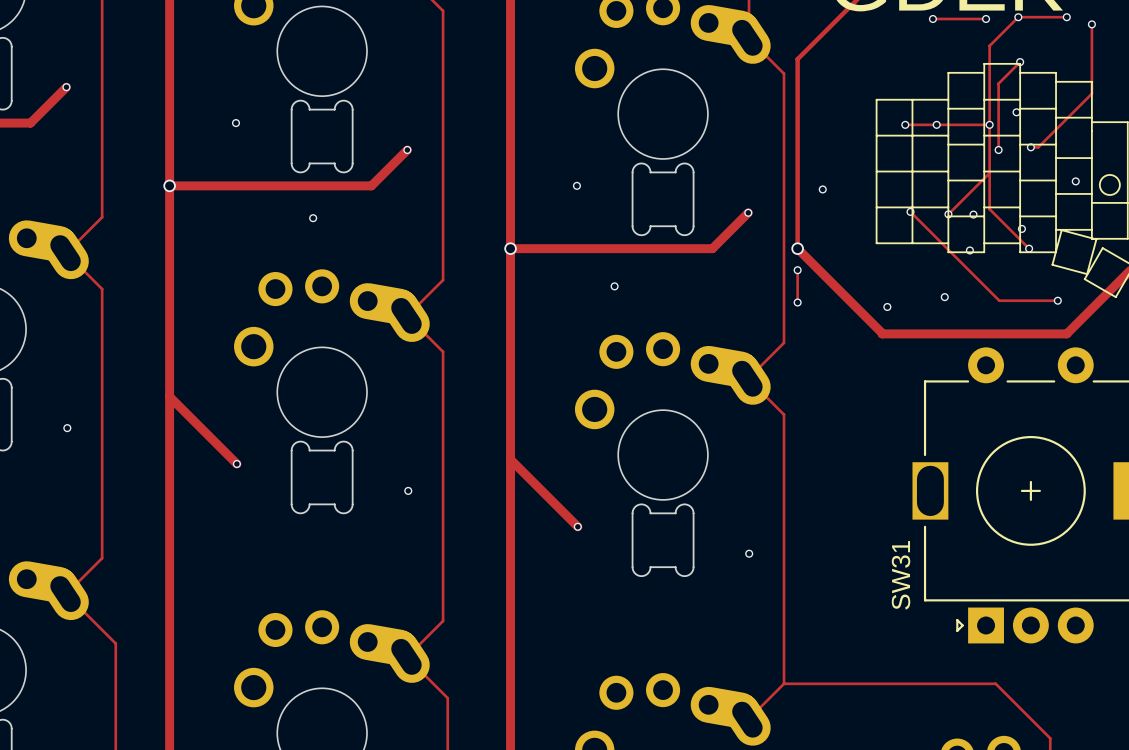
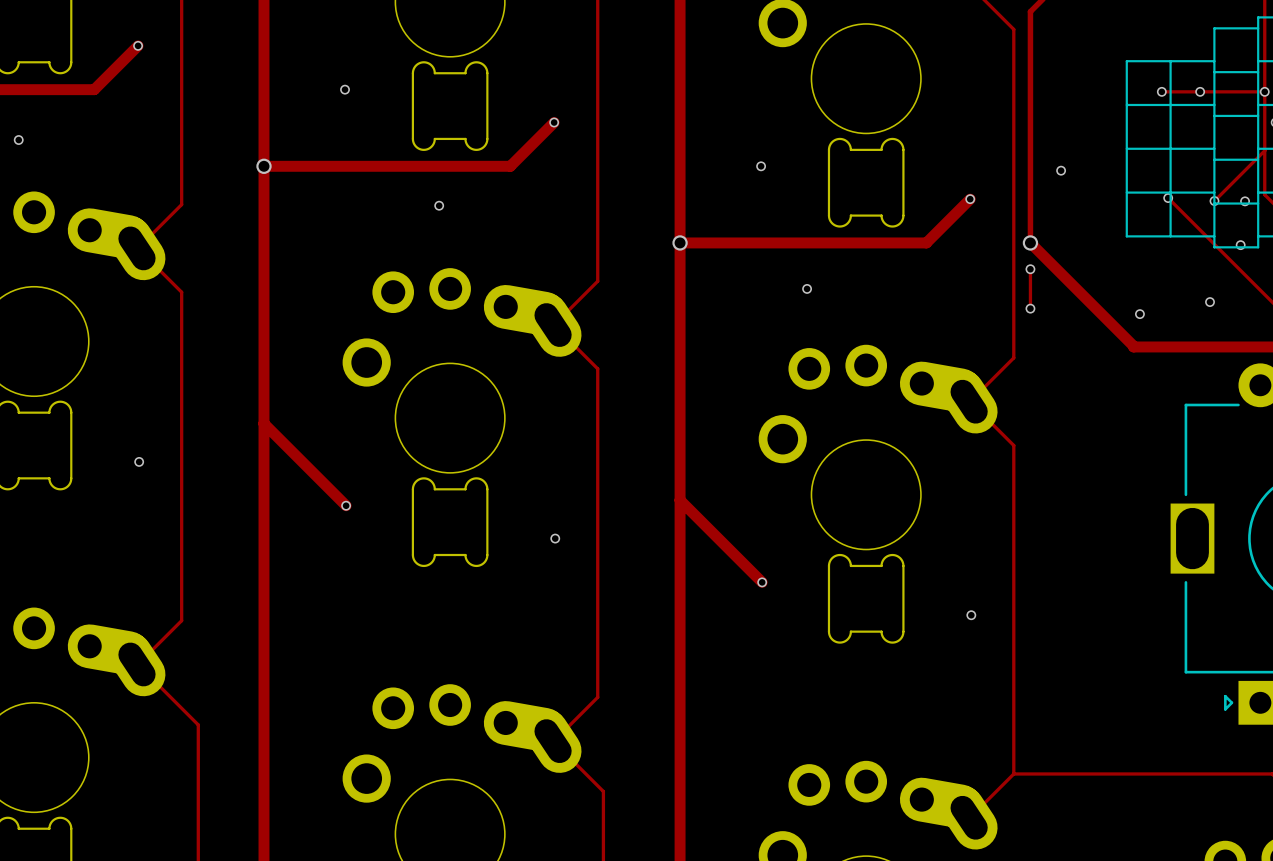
SW31 name: SW31 (901, 575) -> none

